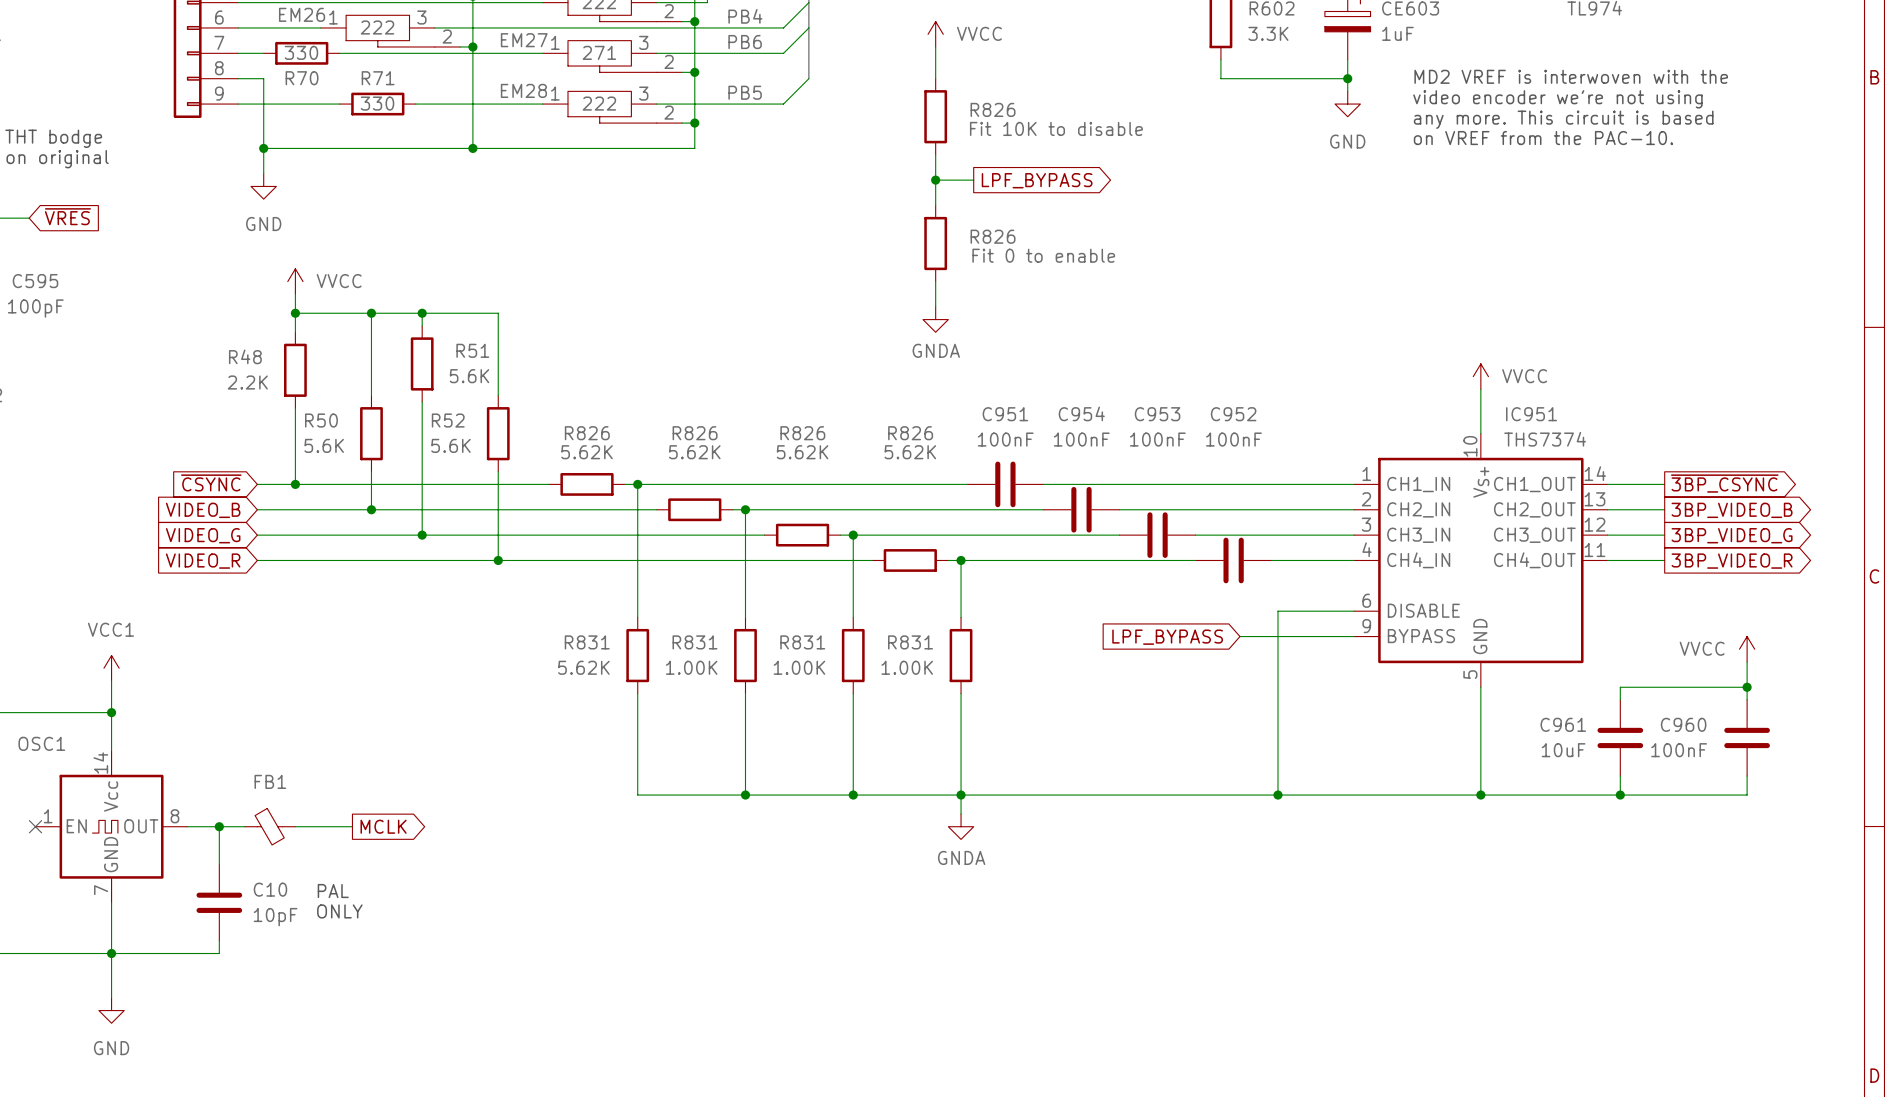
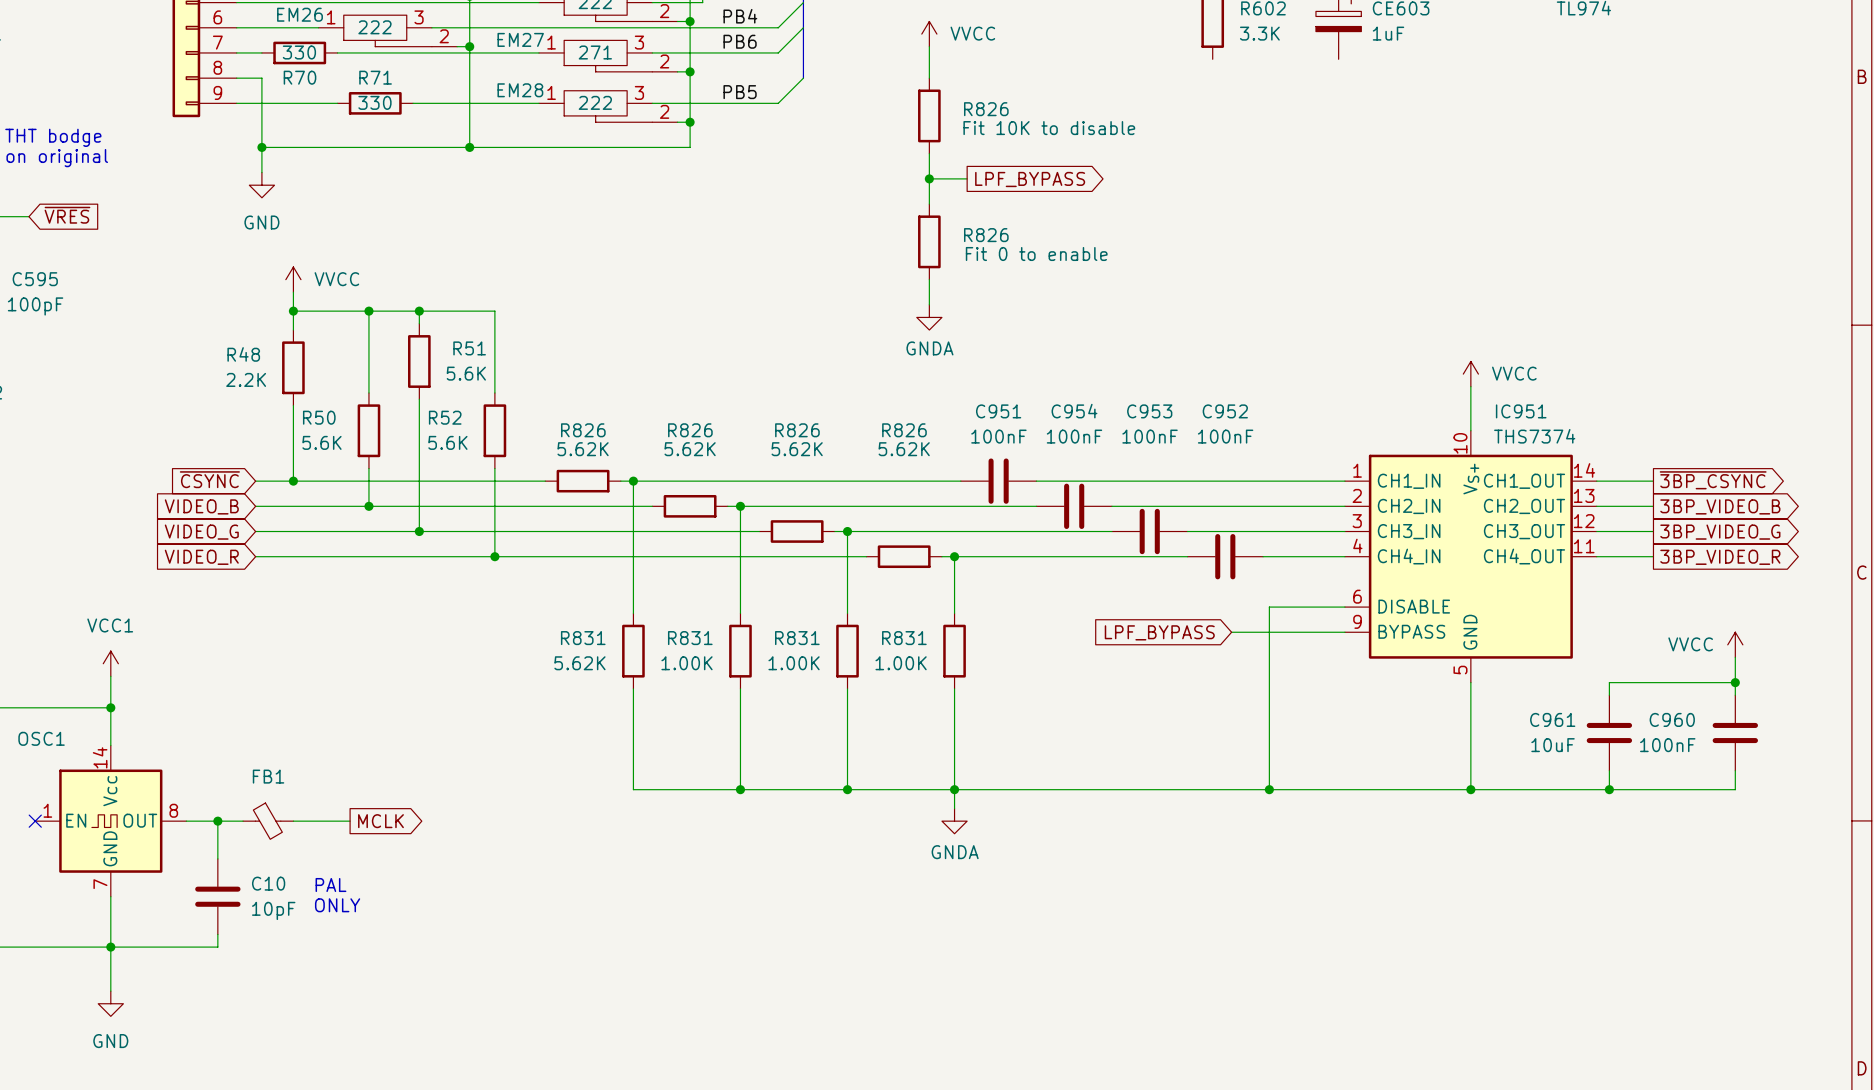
wire: (1220, 59) (1220, 78) (1347, 78) -> none
wire: (1347, 59) (1347, 91) -> none
text: MD2 VREF is interwoven with the (1571, 76) -> none
junction: (1347, 78) -> none
text: video encoder we're not using (1557, 99) -> none
power symbol: GND (1347, 104) -> none
text: any more. This circuit is based (1563, 119) -> none
text: on VREF from the PAC-10. (1543, 138) -> none

